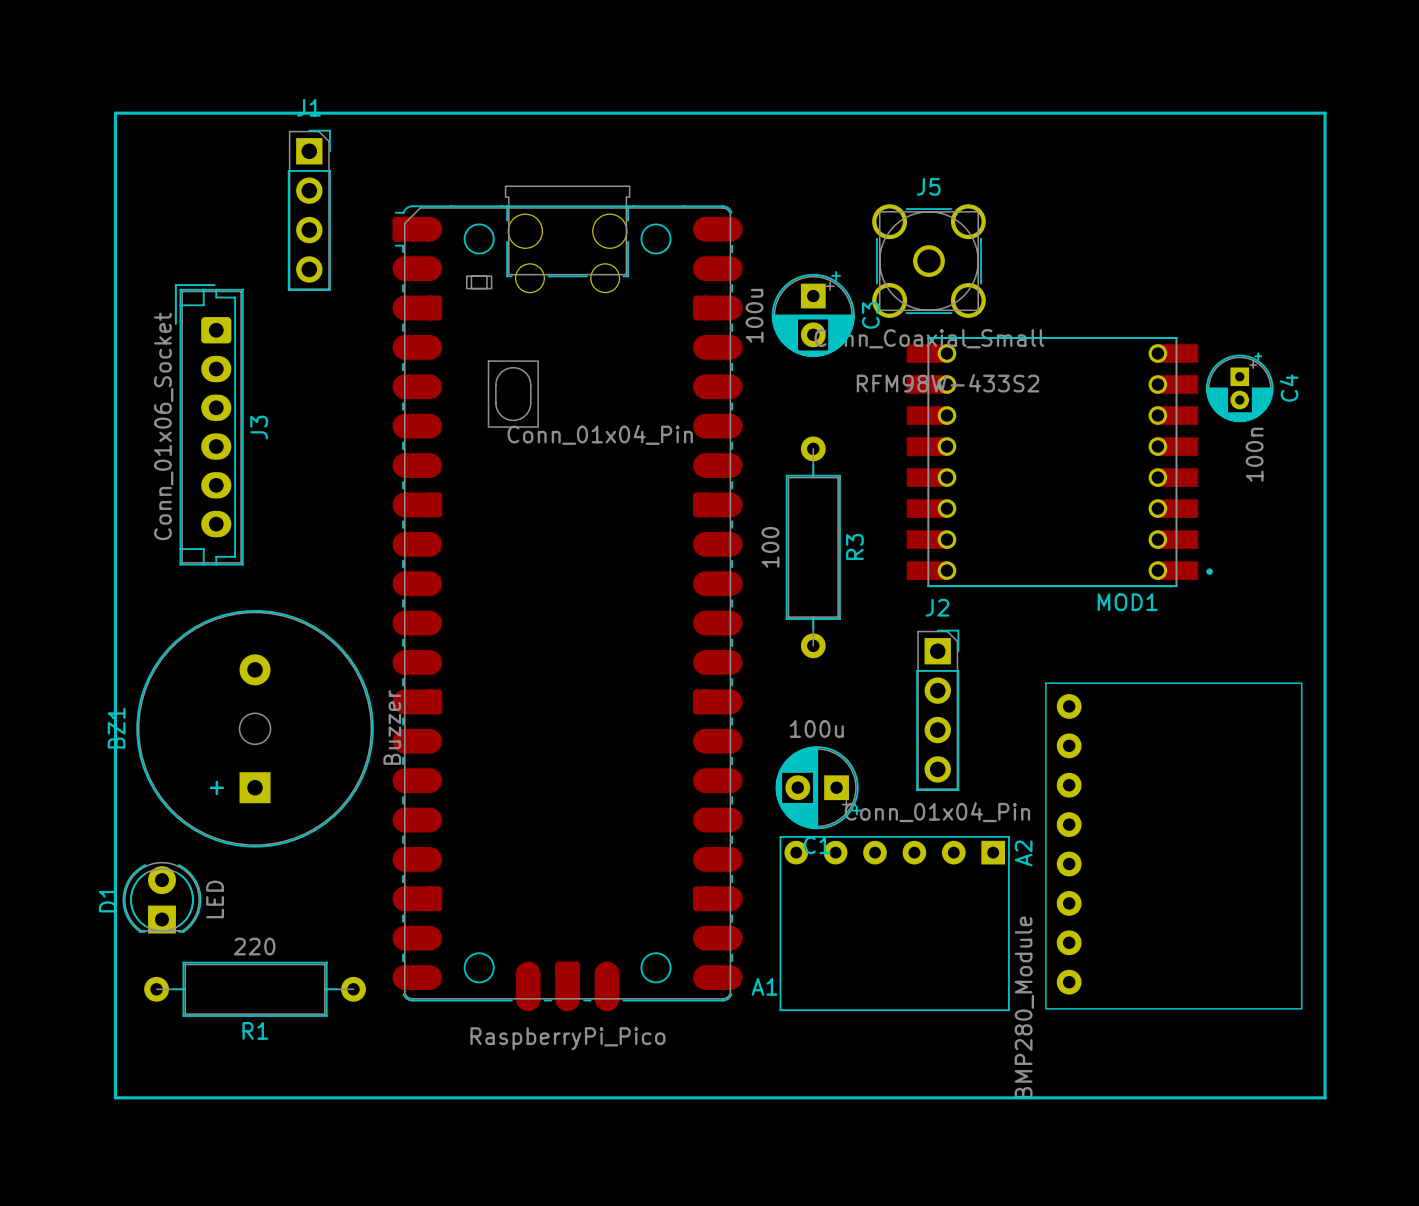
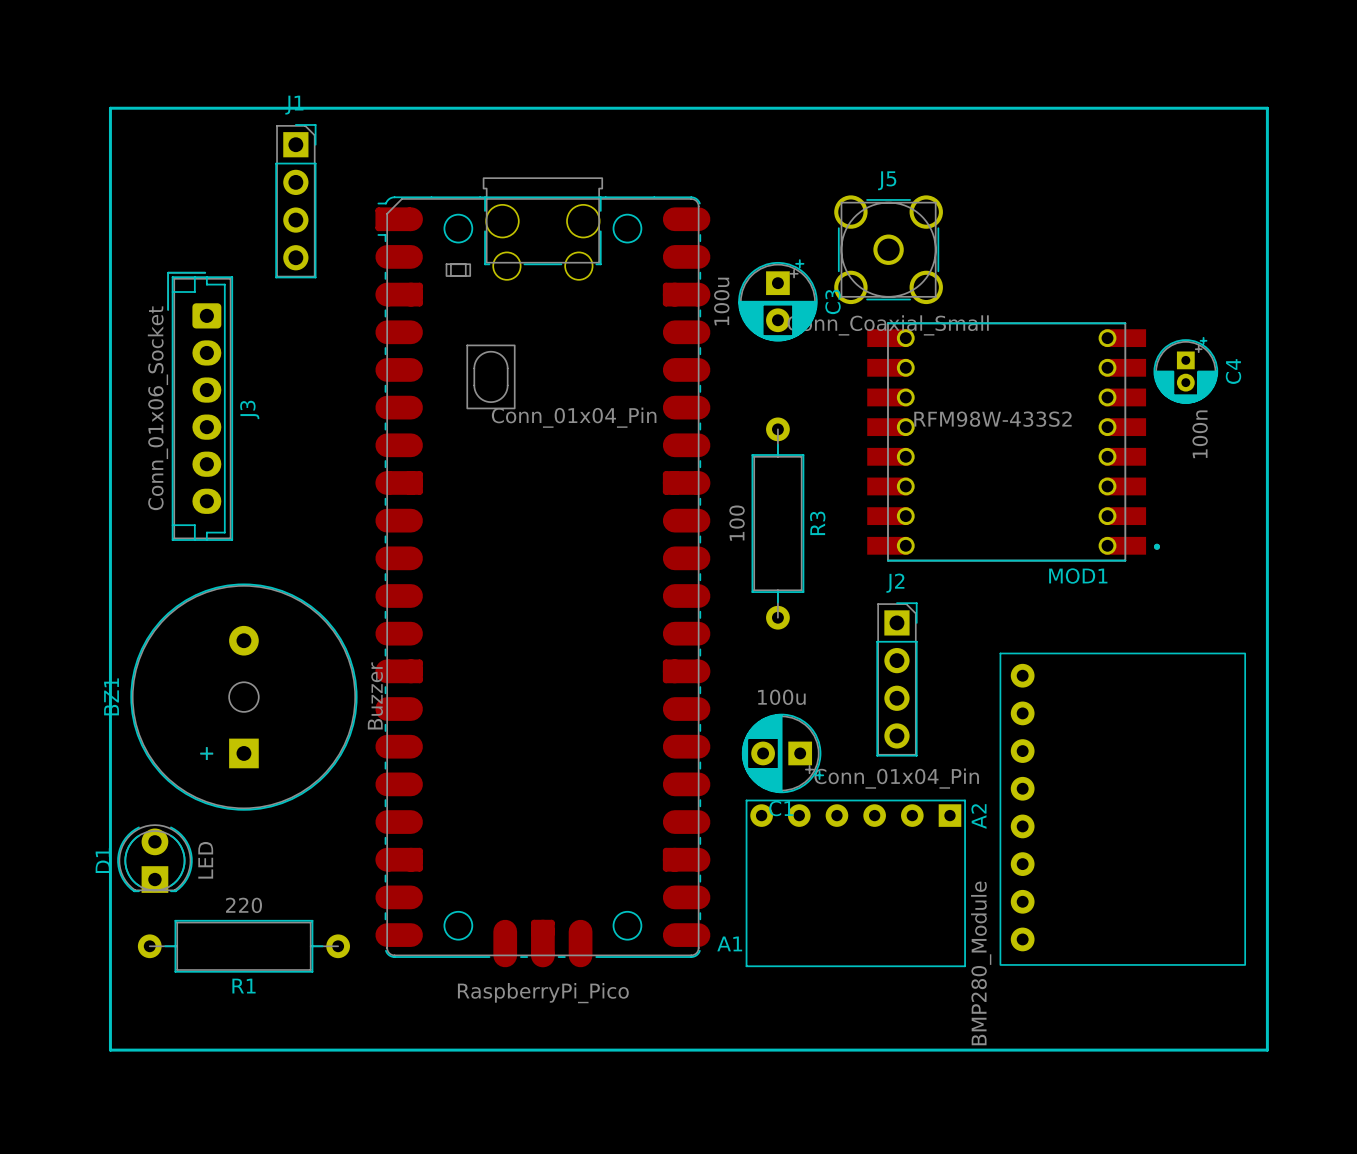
MOD1 value position: RFM98W-433S2 (948, 383) -> RFM98W-433S2 (992, 419)

